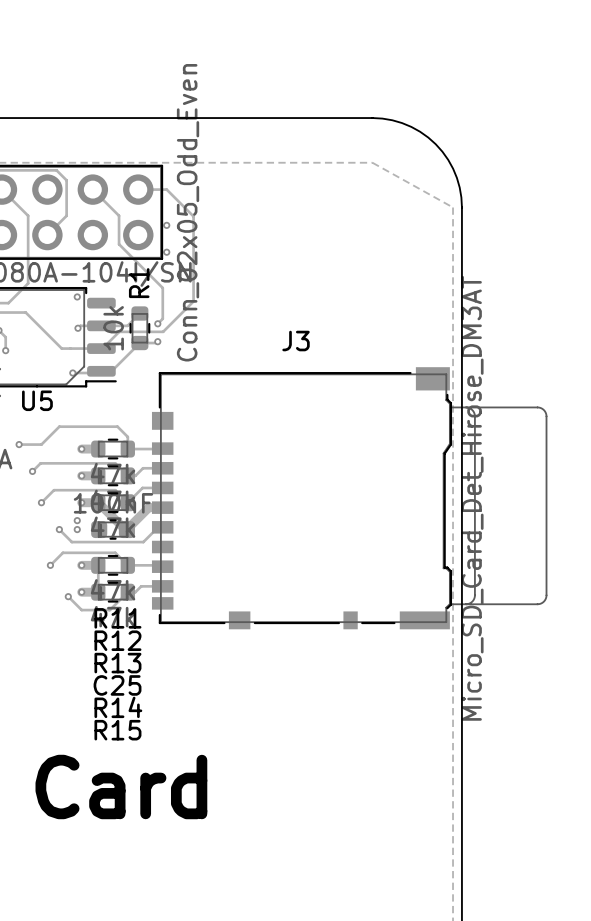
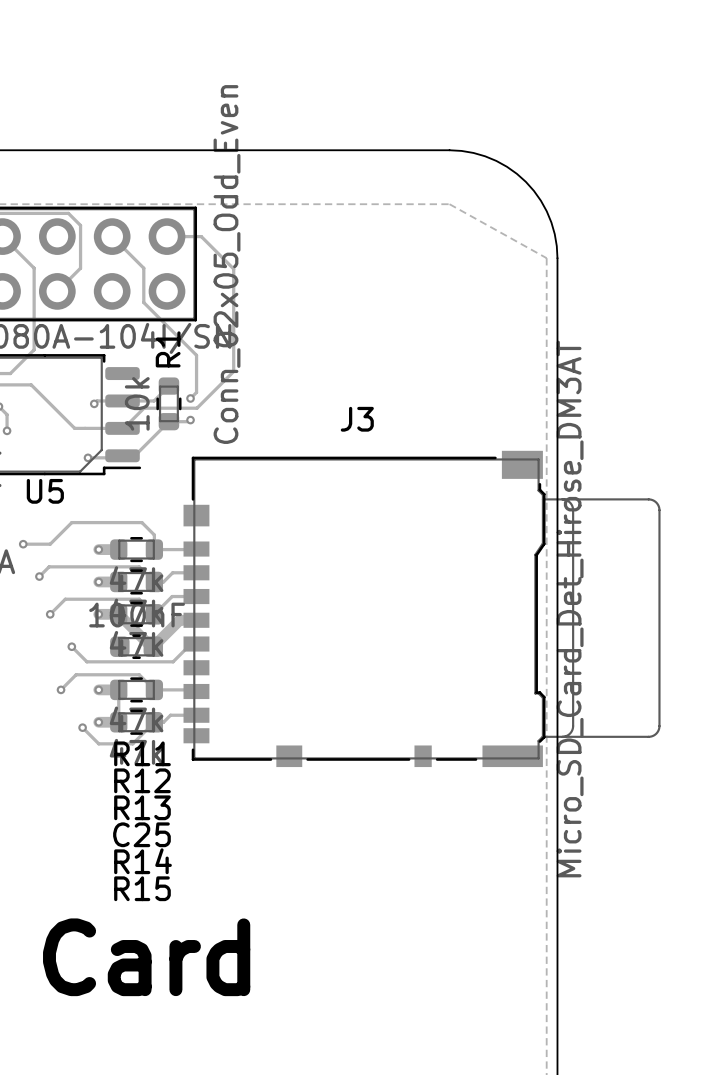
via: (166, 225) -> none
via: (166, 252) -> none
via: (77, 296) -> none
via: (77, 520) -> none
via: (77, 529) -> none

